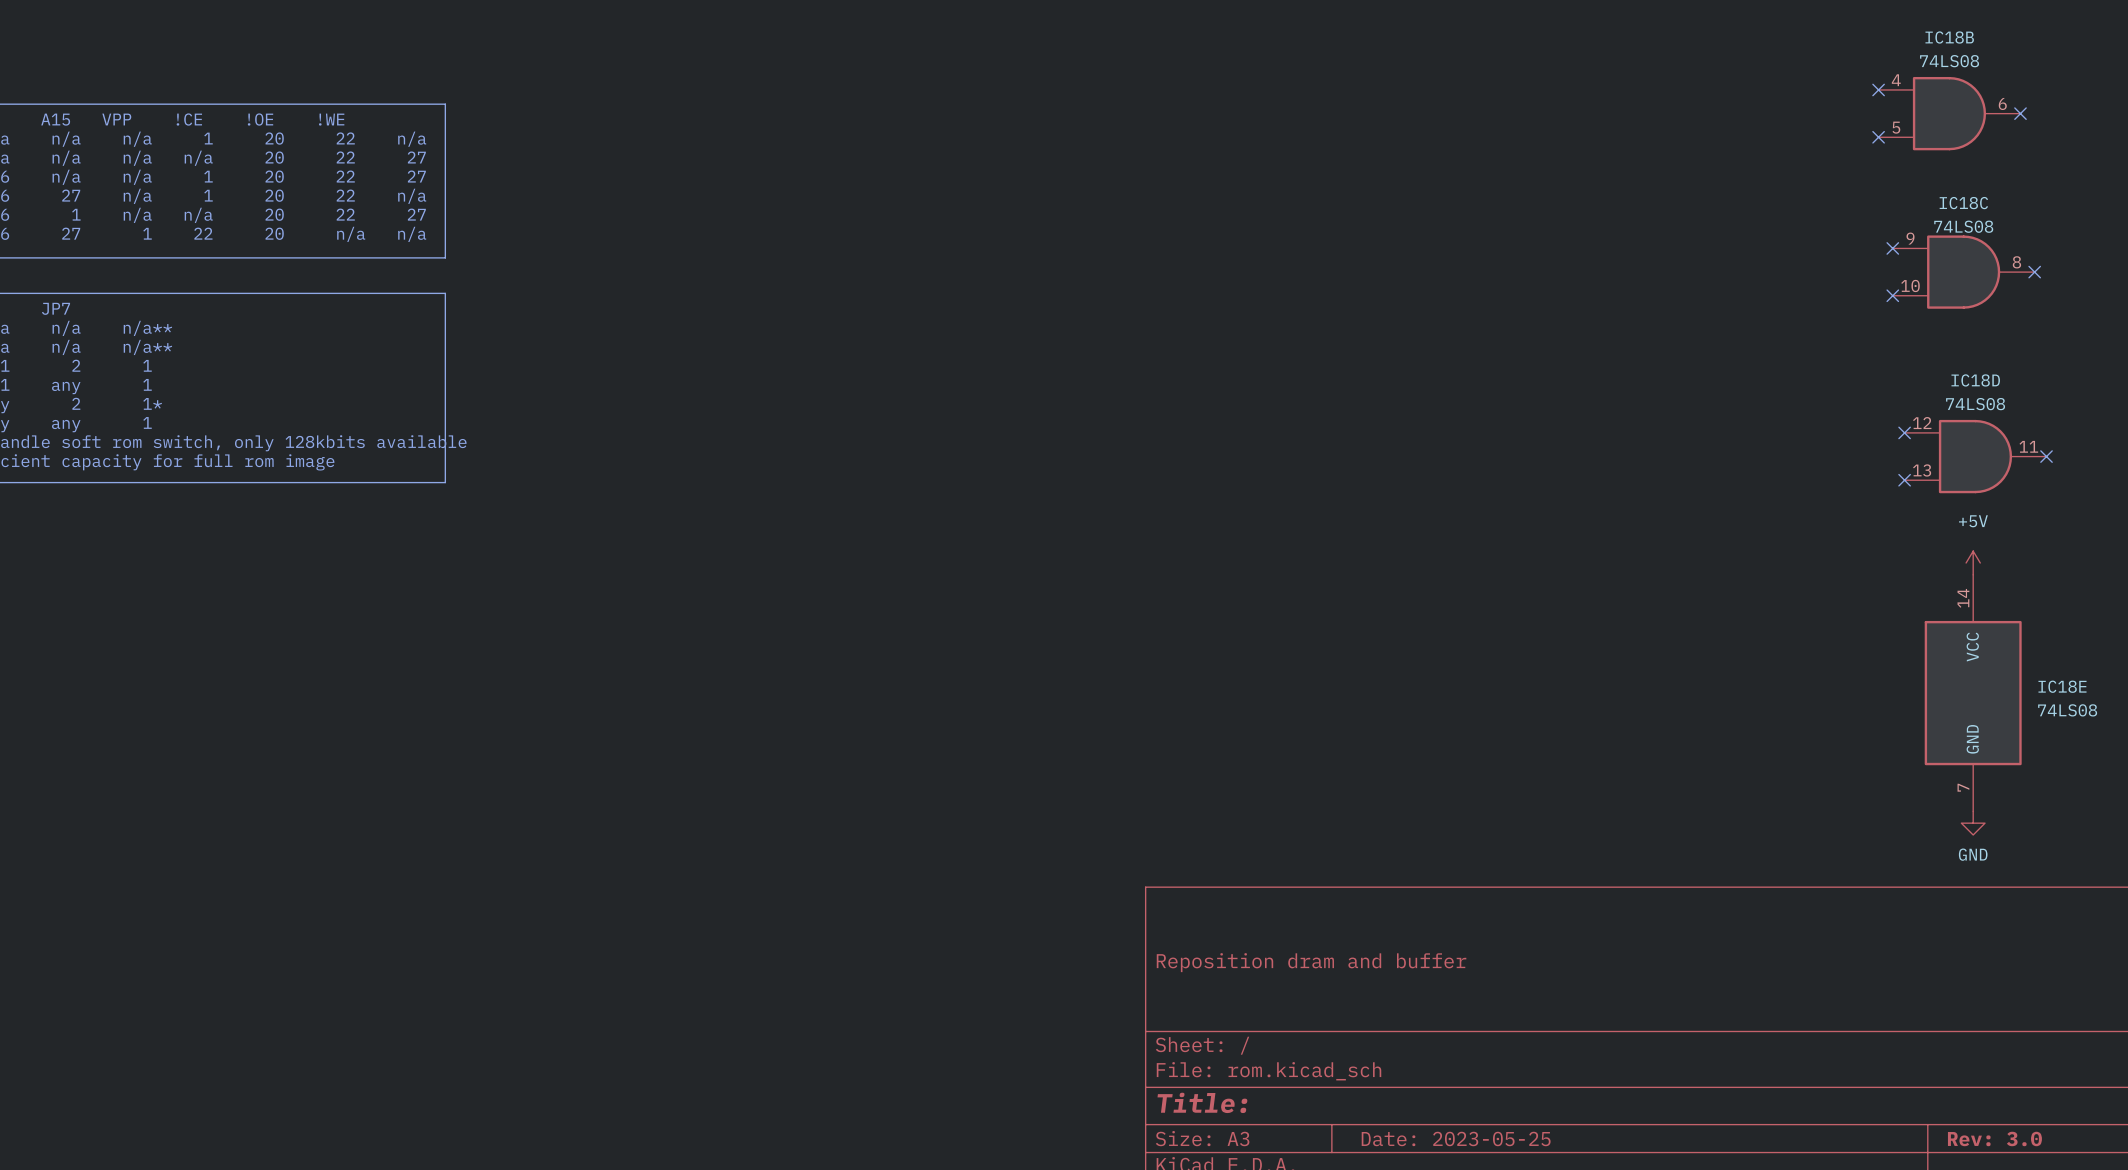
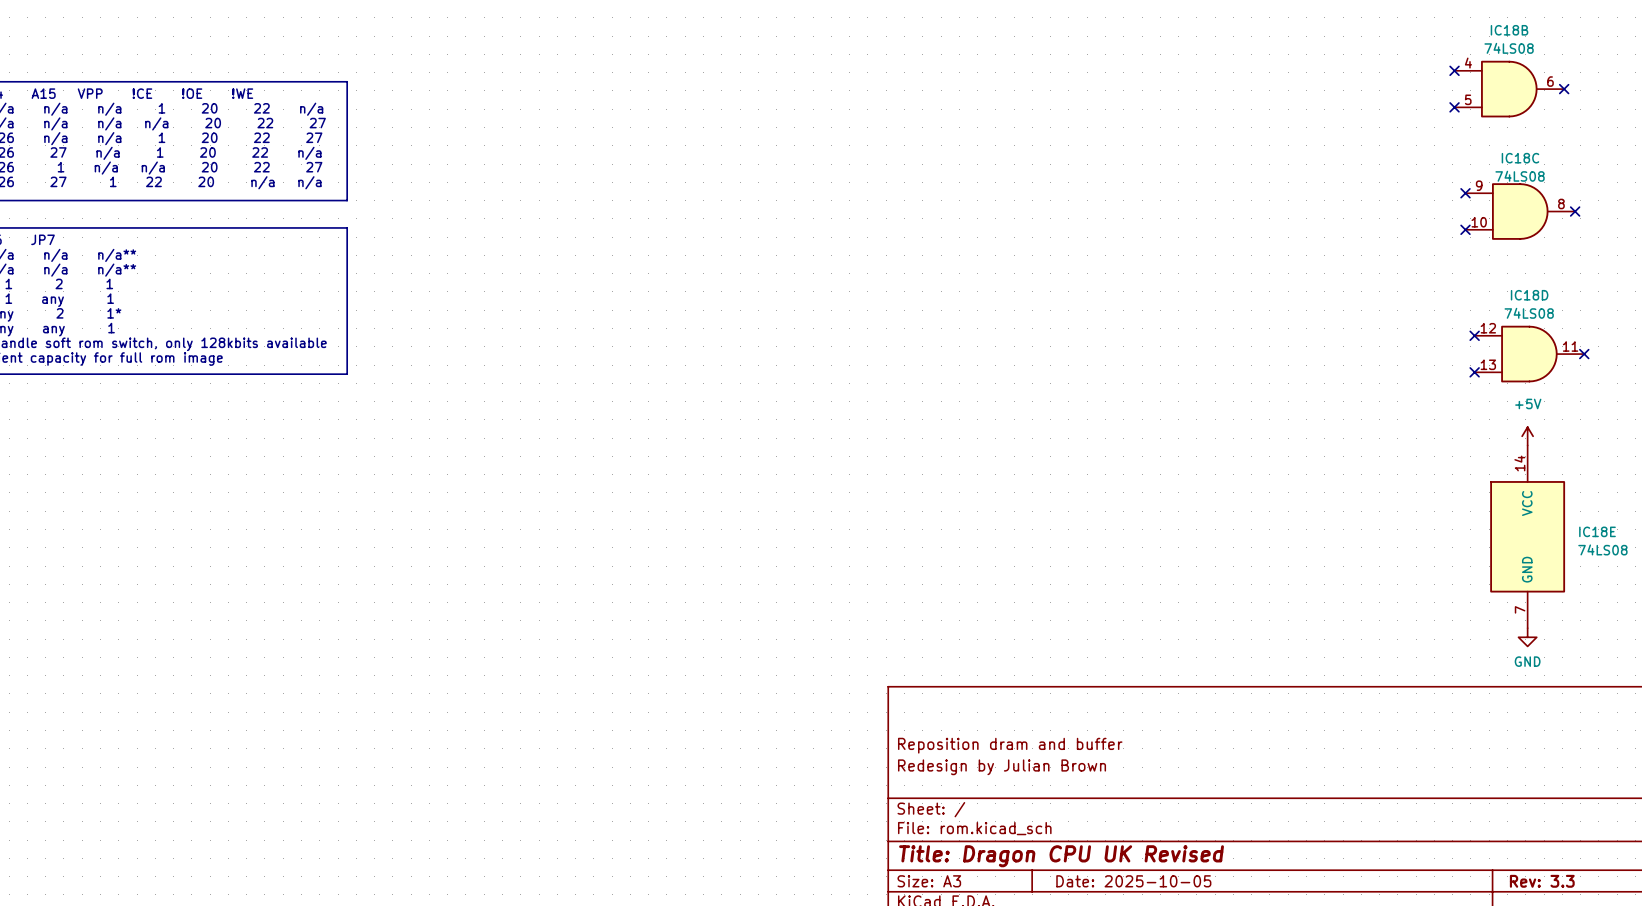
title block: none -> Redesign by Julian Brown (1002, 767)
title block: Title: (1202, 1102) -> Title: Dragon CPU UK Revised (1061, 856)
title block: Date: 2023-05-25 (1456, 1138) -> Date: 2025-10-05 (1133, 881)
title block: Rev: 3.0 (1994, 1138) -> Rev: 3.3 (1542, 881)

